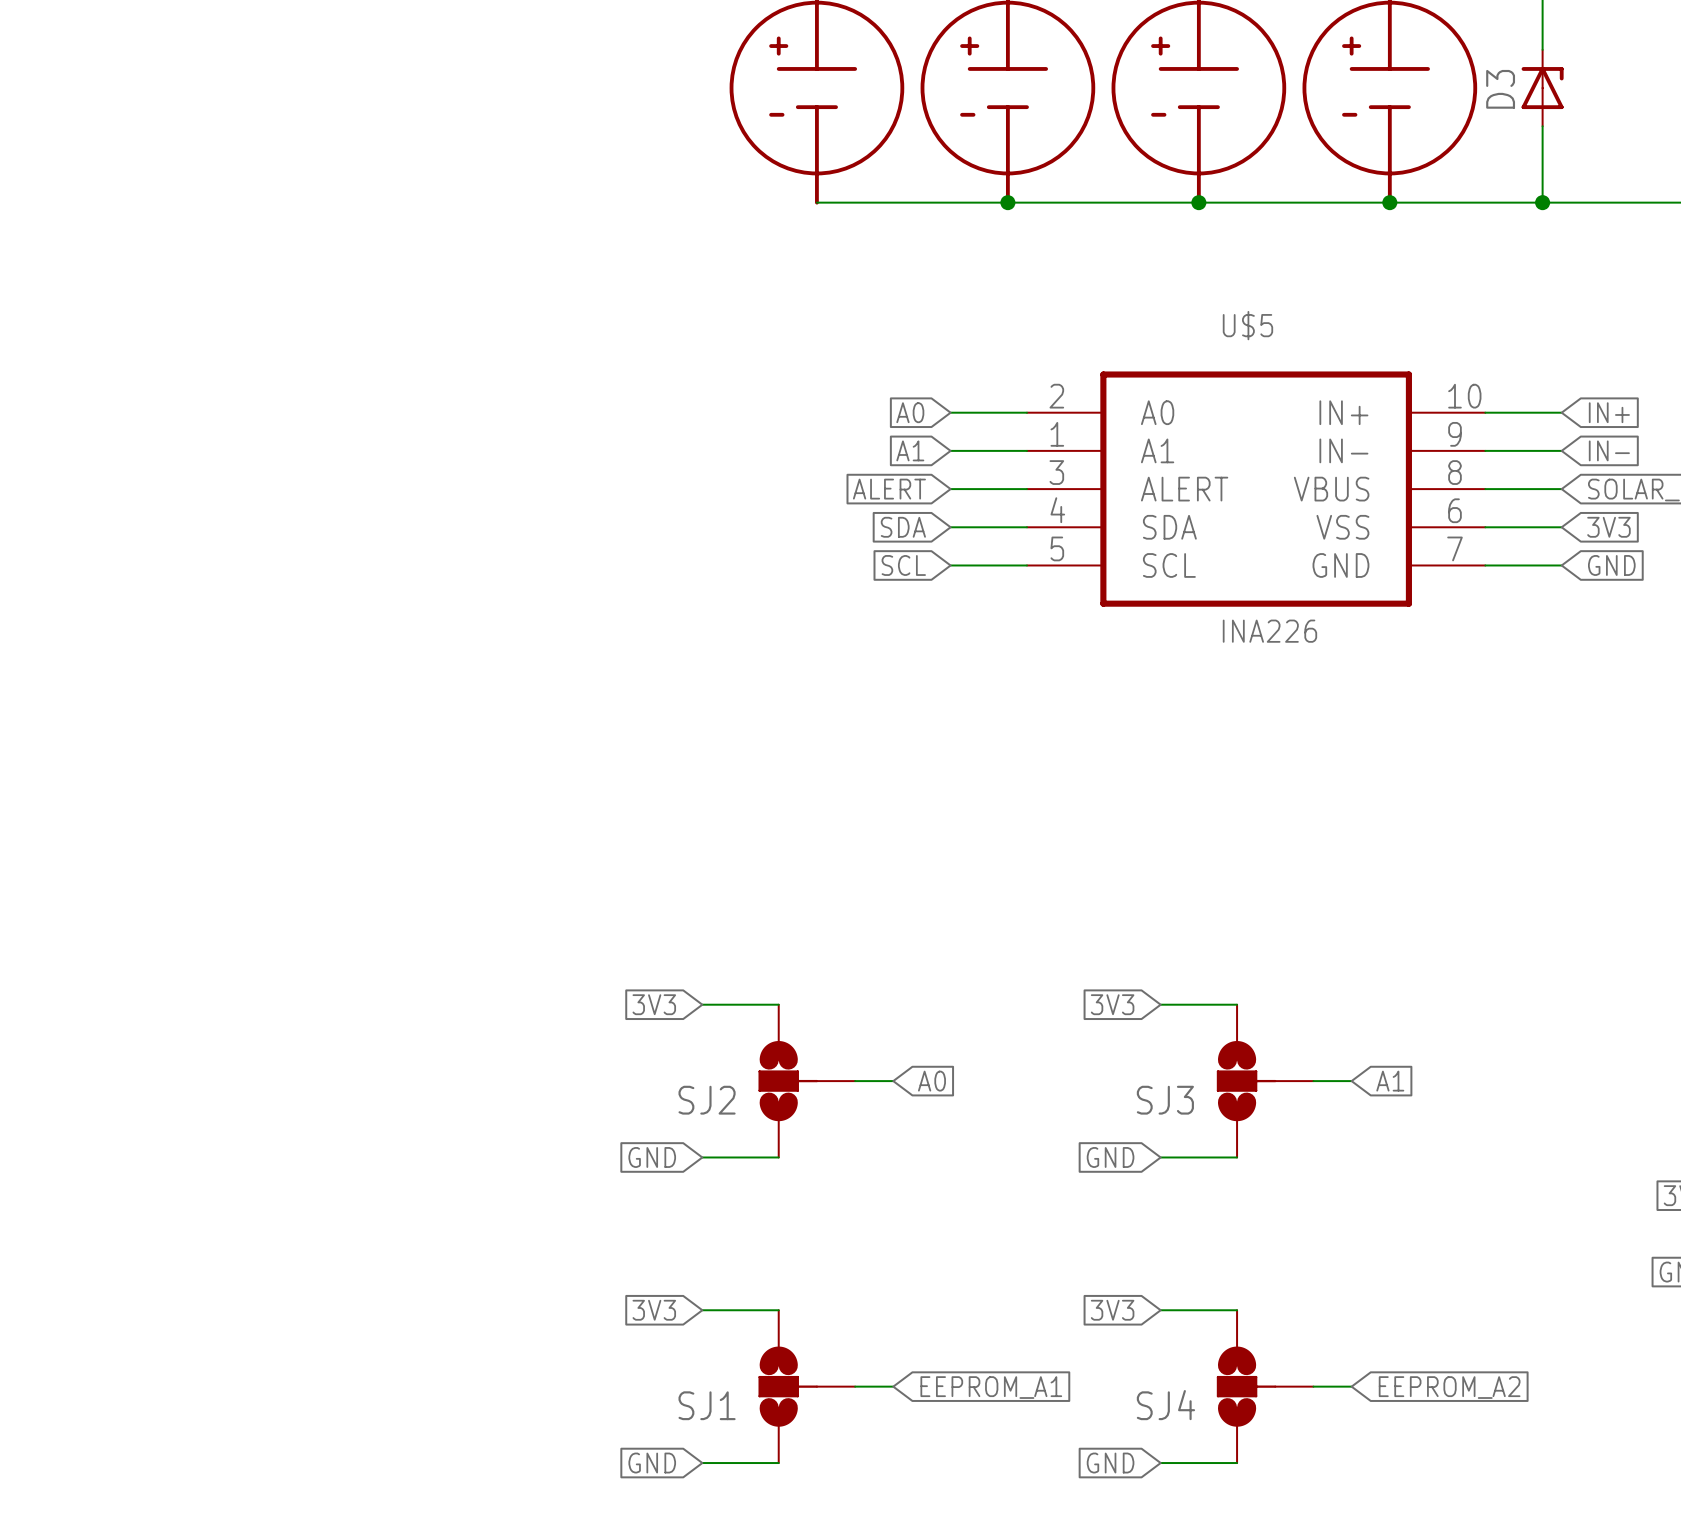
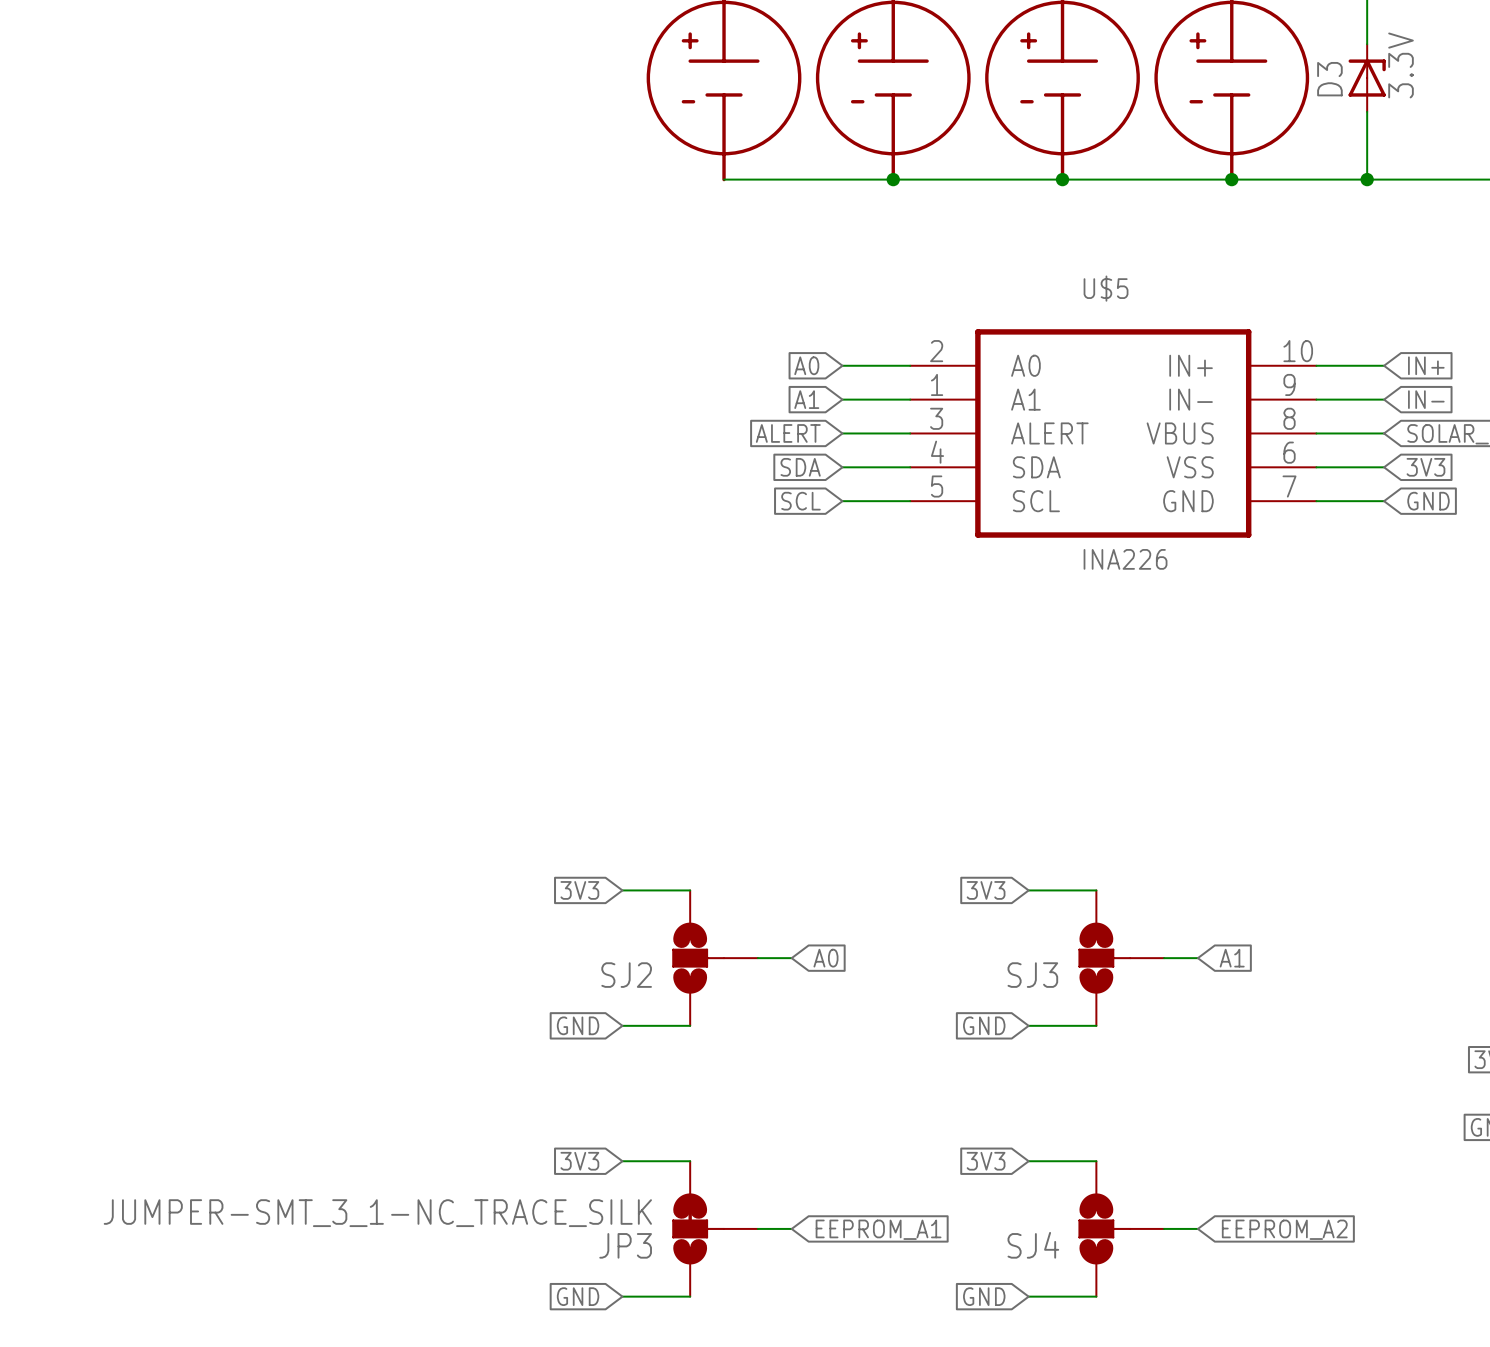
D3 value: none -> 3.3V (1401, 65)
SJ1: (806, 1386) -> none
JP3: none -> JUMPER-SMT_3_1-NC_TRACE_SILK (715, 1228)

